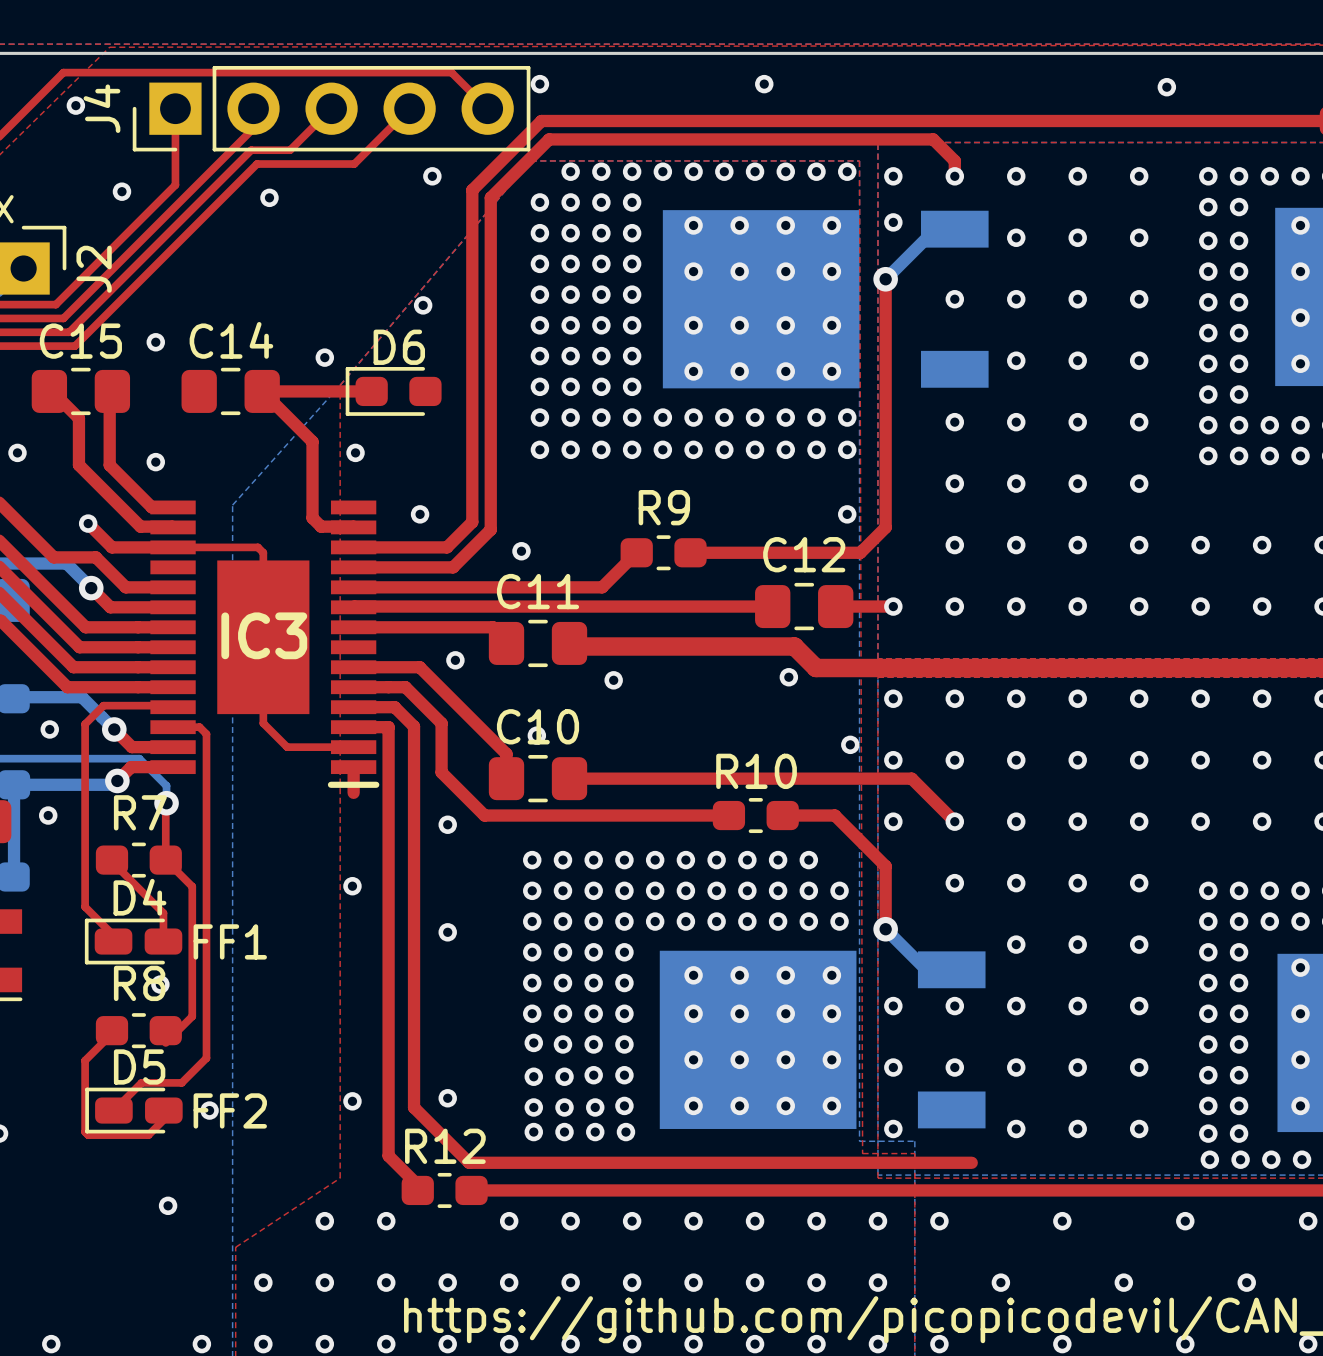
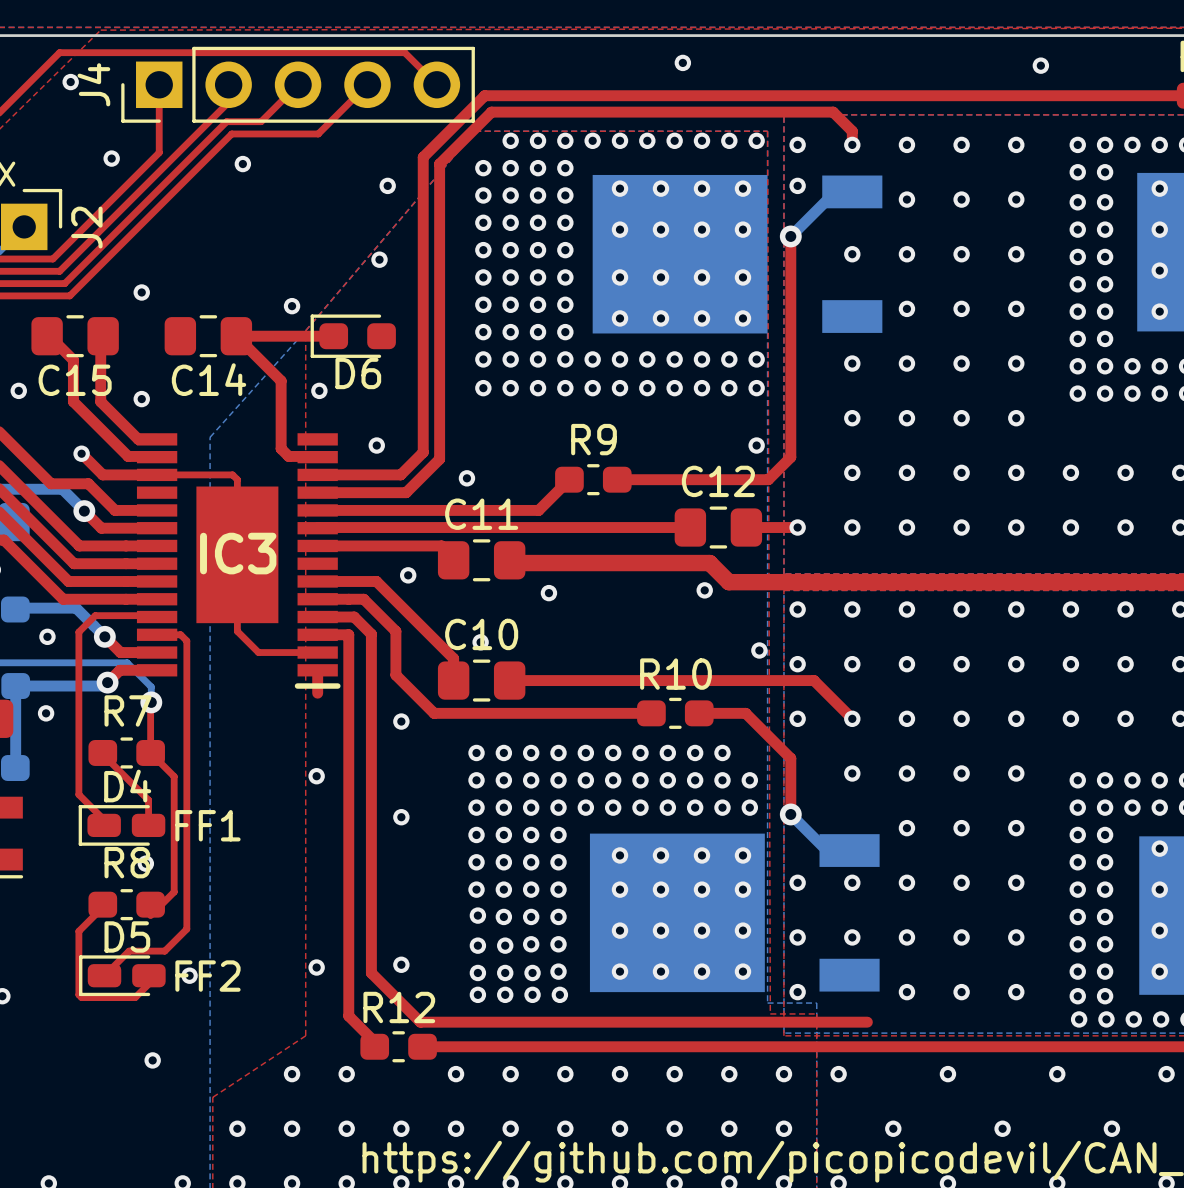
via: (539, 84) -> none
via position: (432, 176) -> (387, 185)
C14 name position: C14 (231, 340) -> C14 (209, 379)
C15 name position: C15 (80, 341) -> C15 (75, 380)
D6 name position: D6 (399, 347) -> D6 (358, 373)

